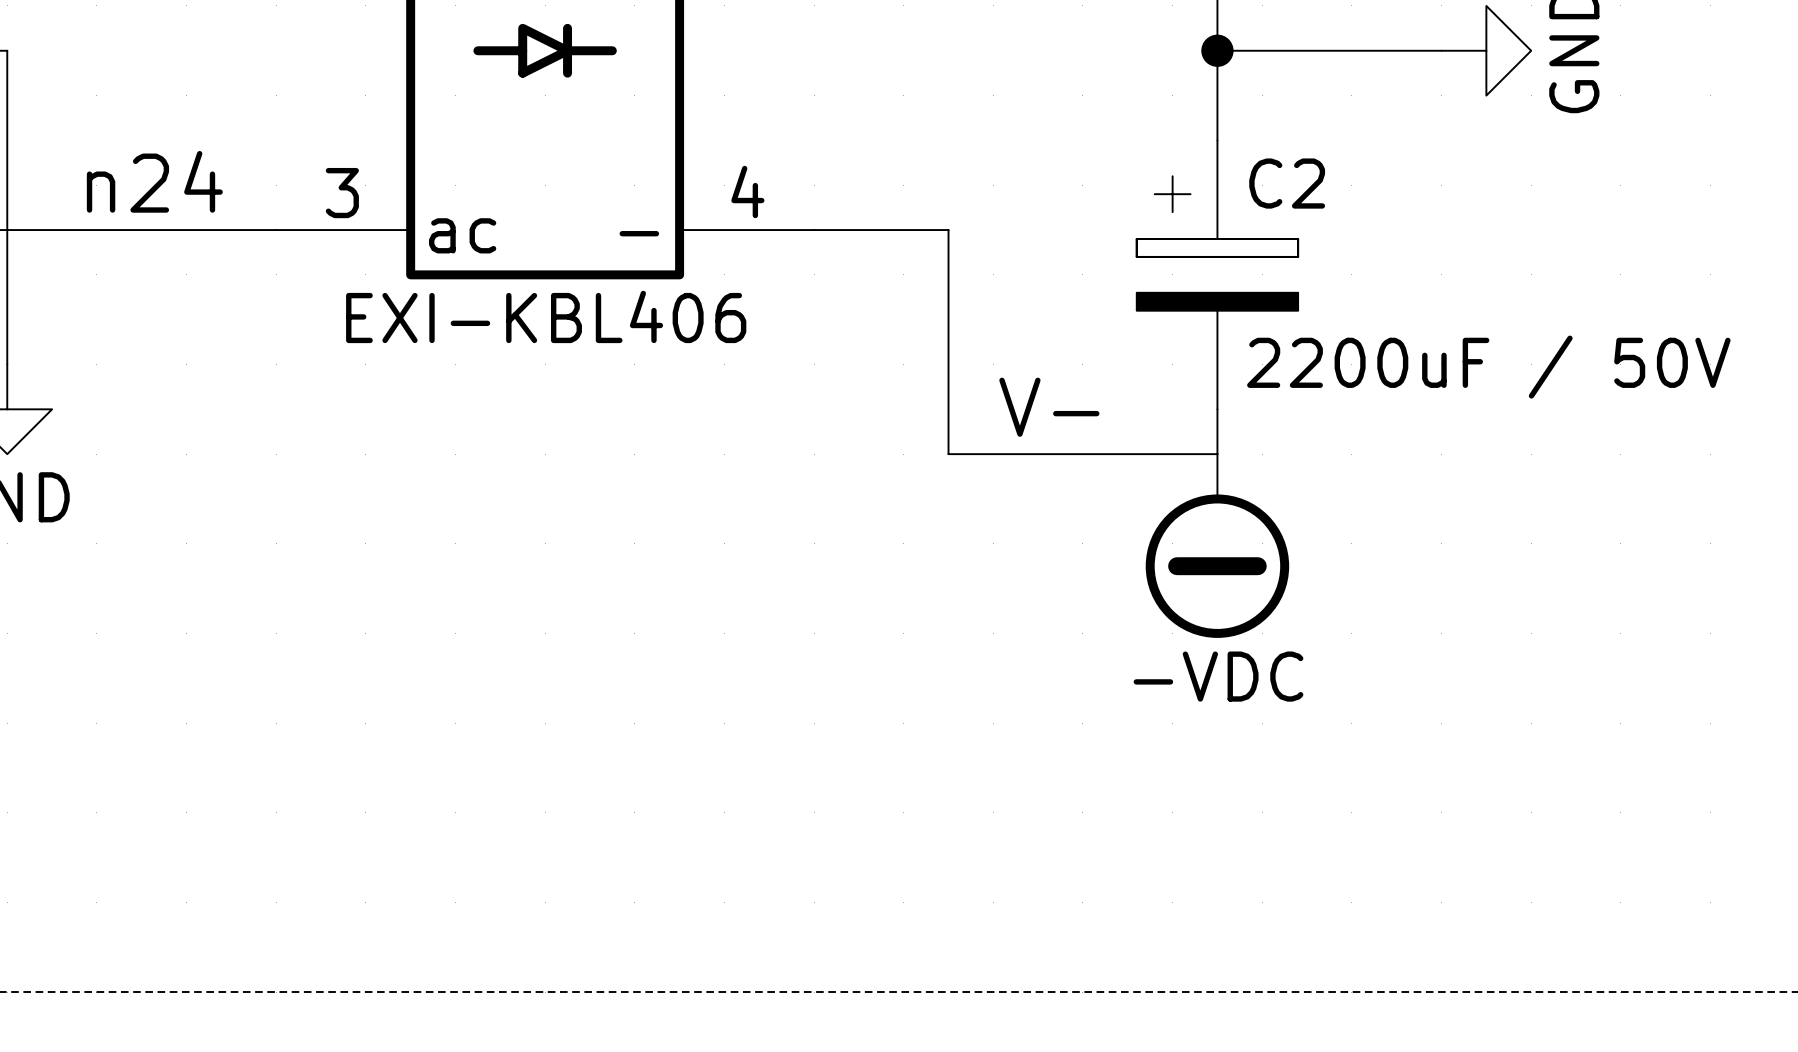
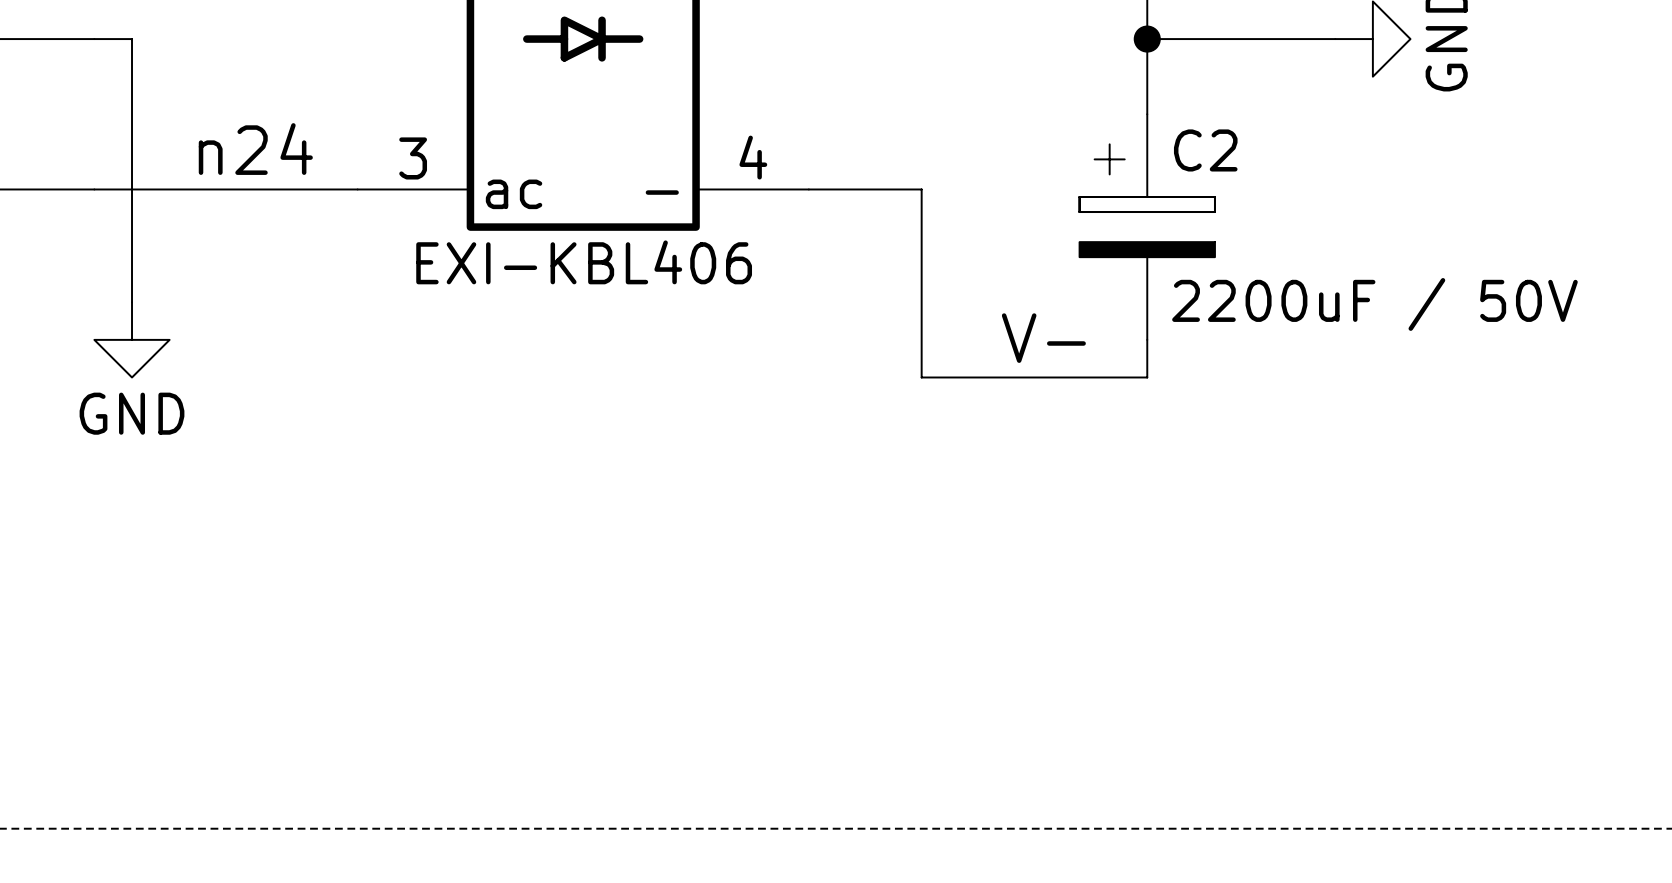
label position: V- (1049, 407) -> V- (1043, 338)
power symbol: -VDC (1217, 546) -> none

